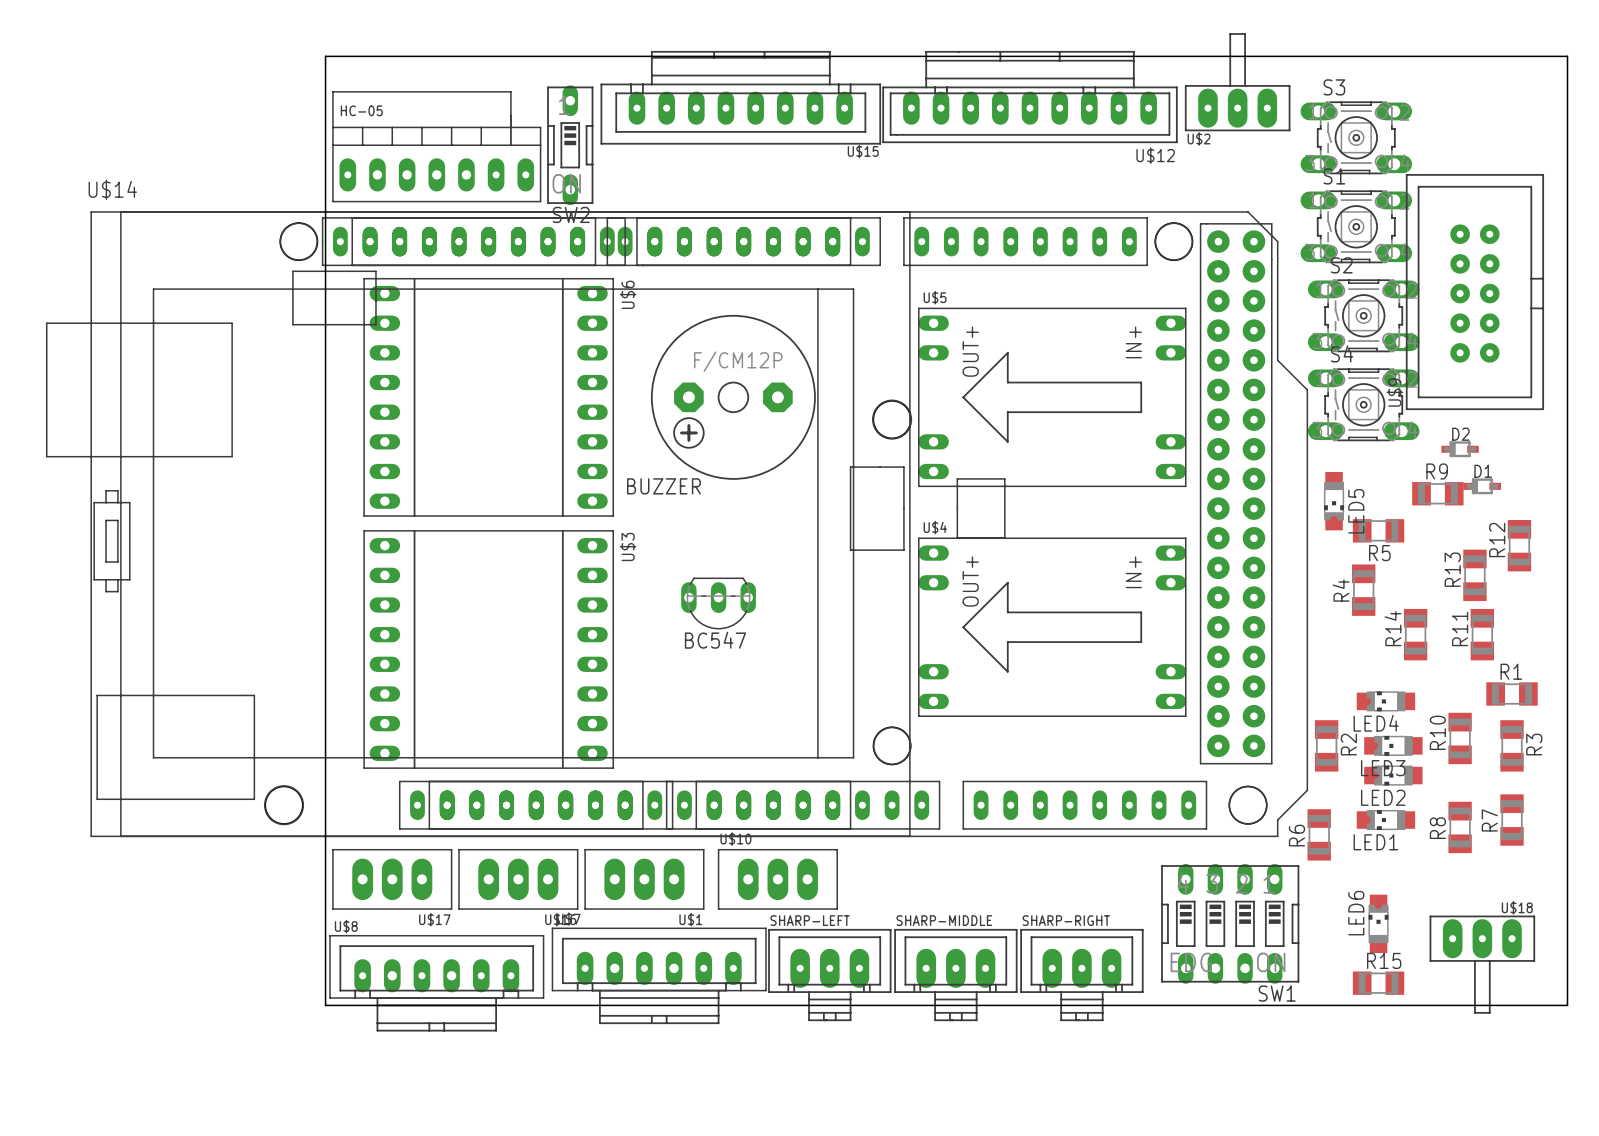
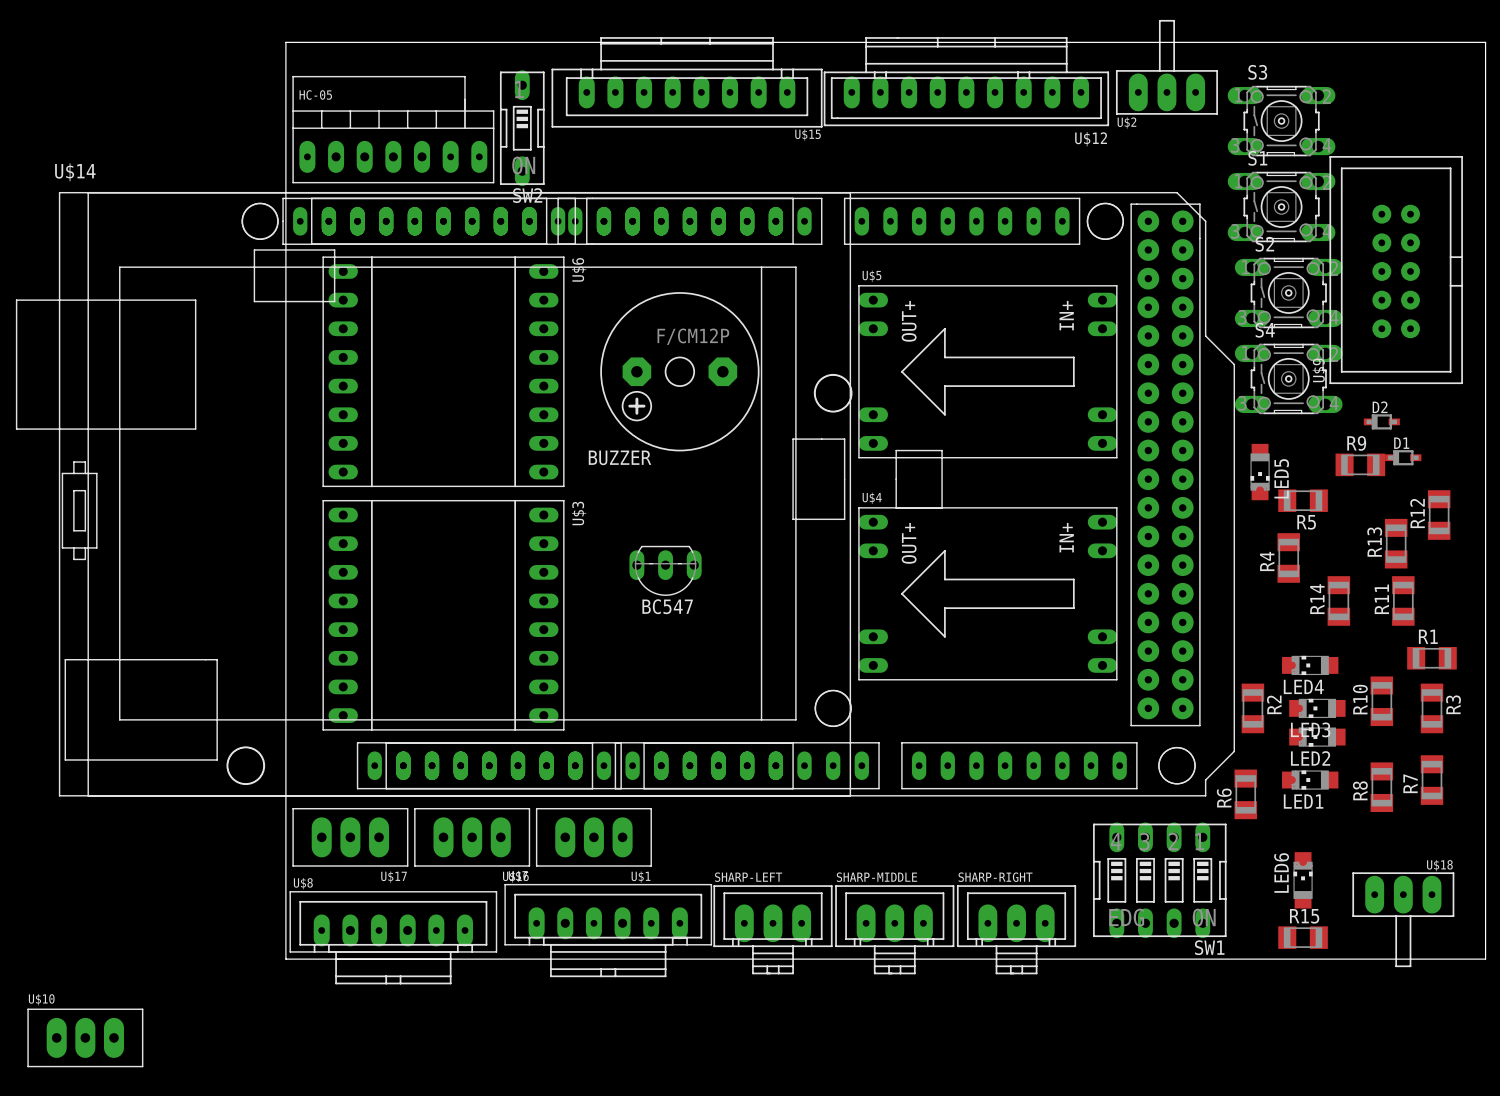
U$10 position: (777, 879) -> (85, 1037)

